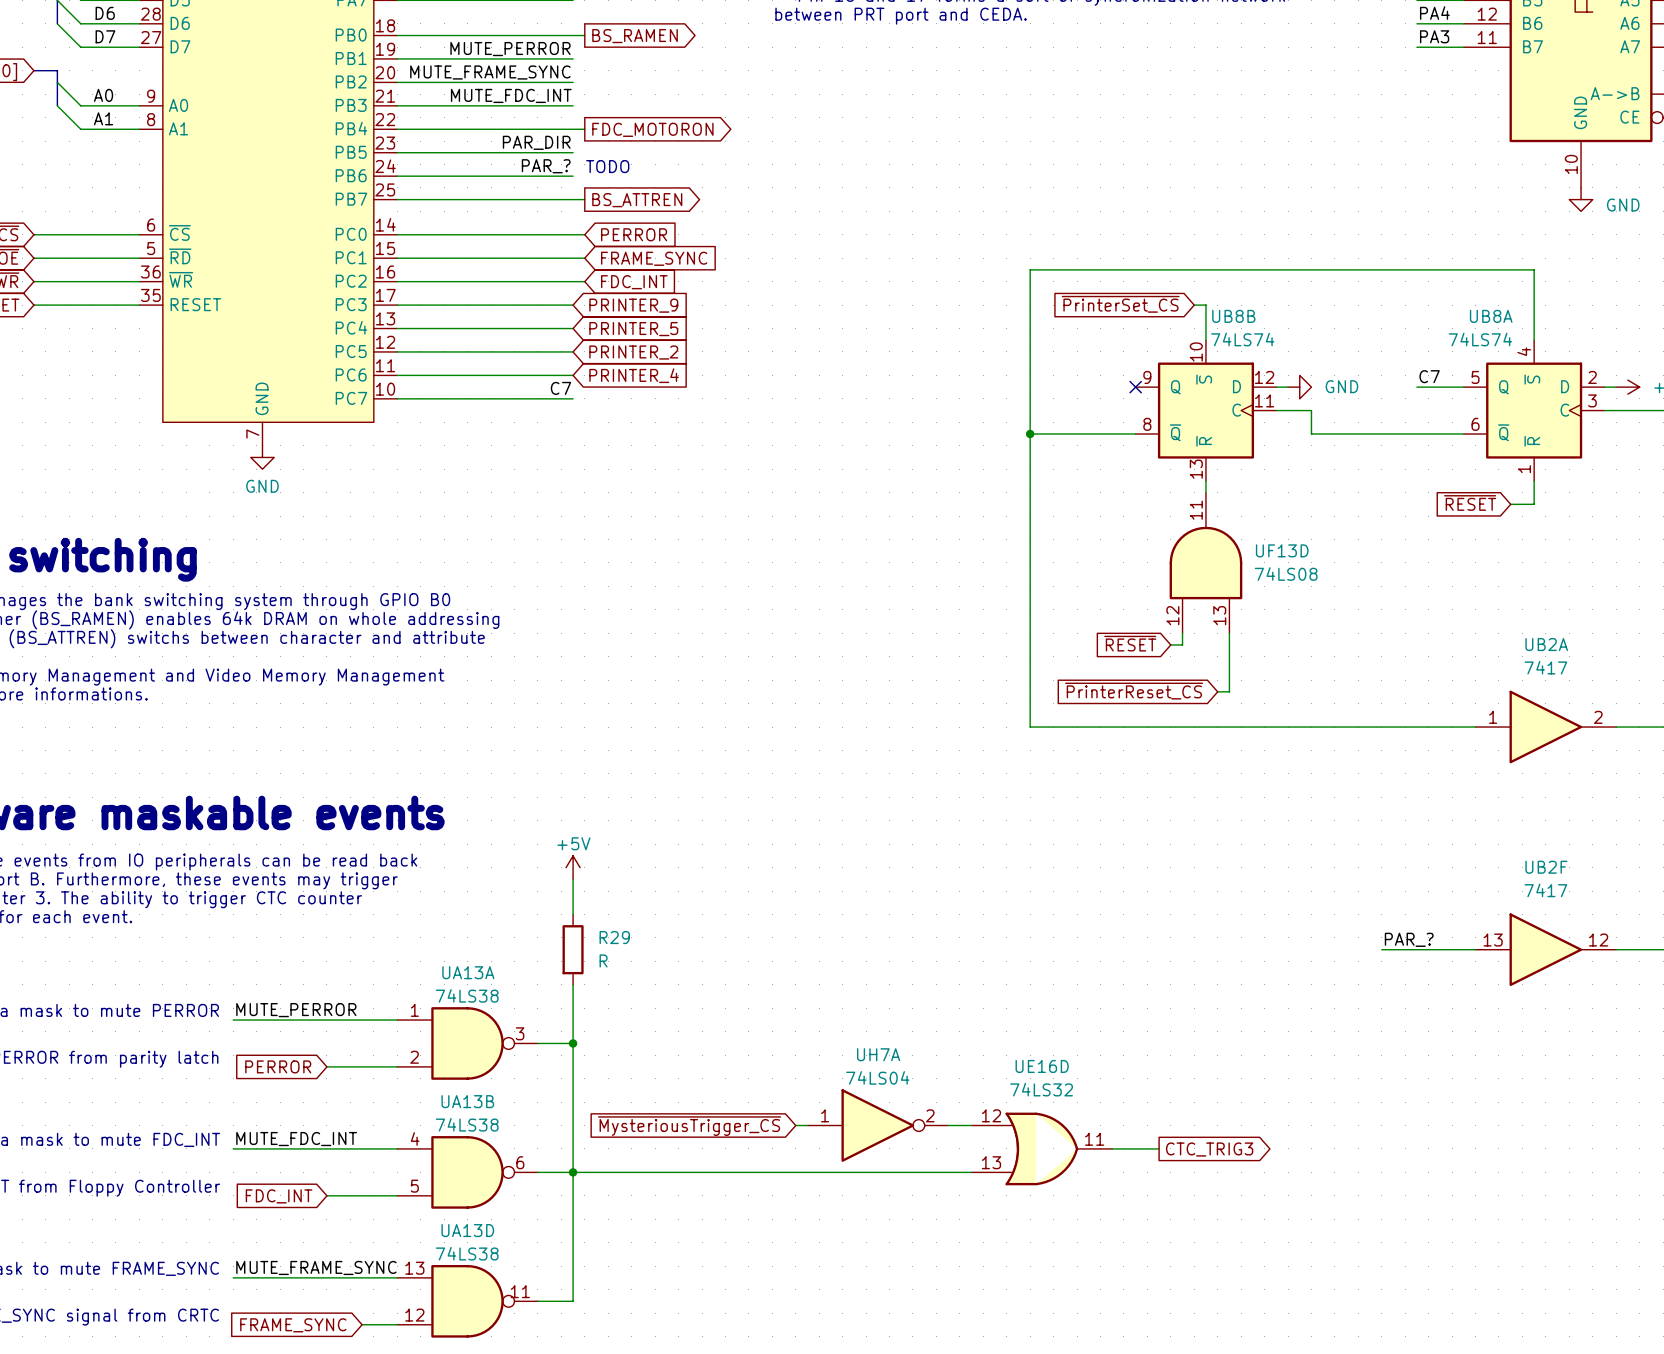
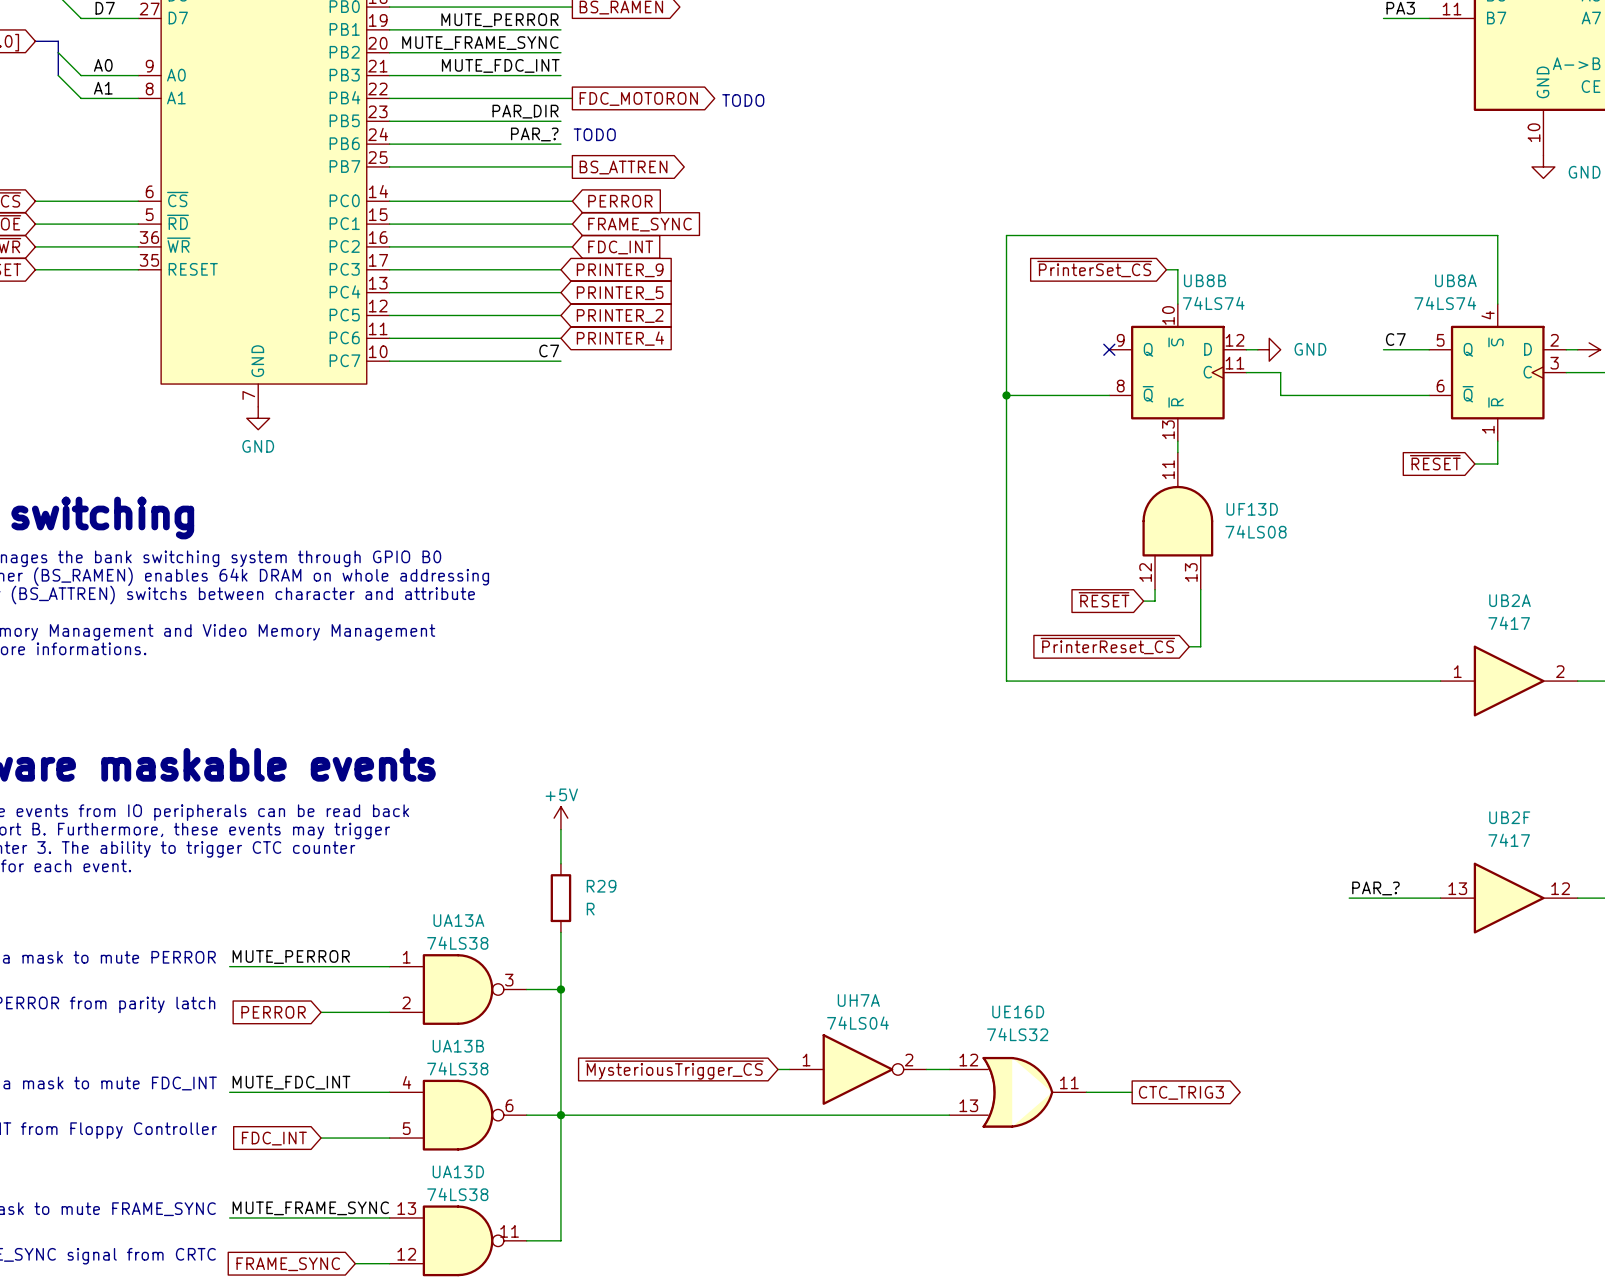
text: none -> TODO (743, 100)

